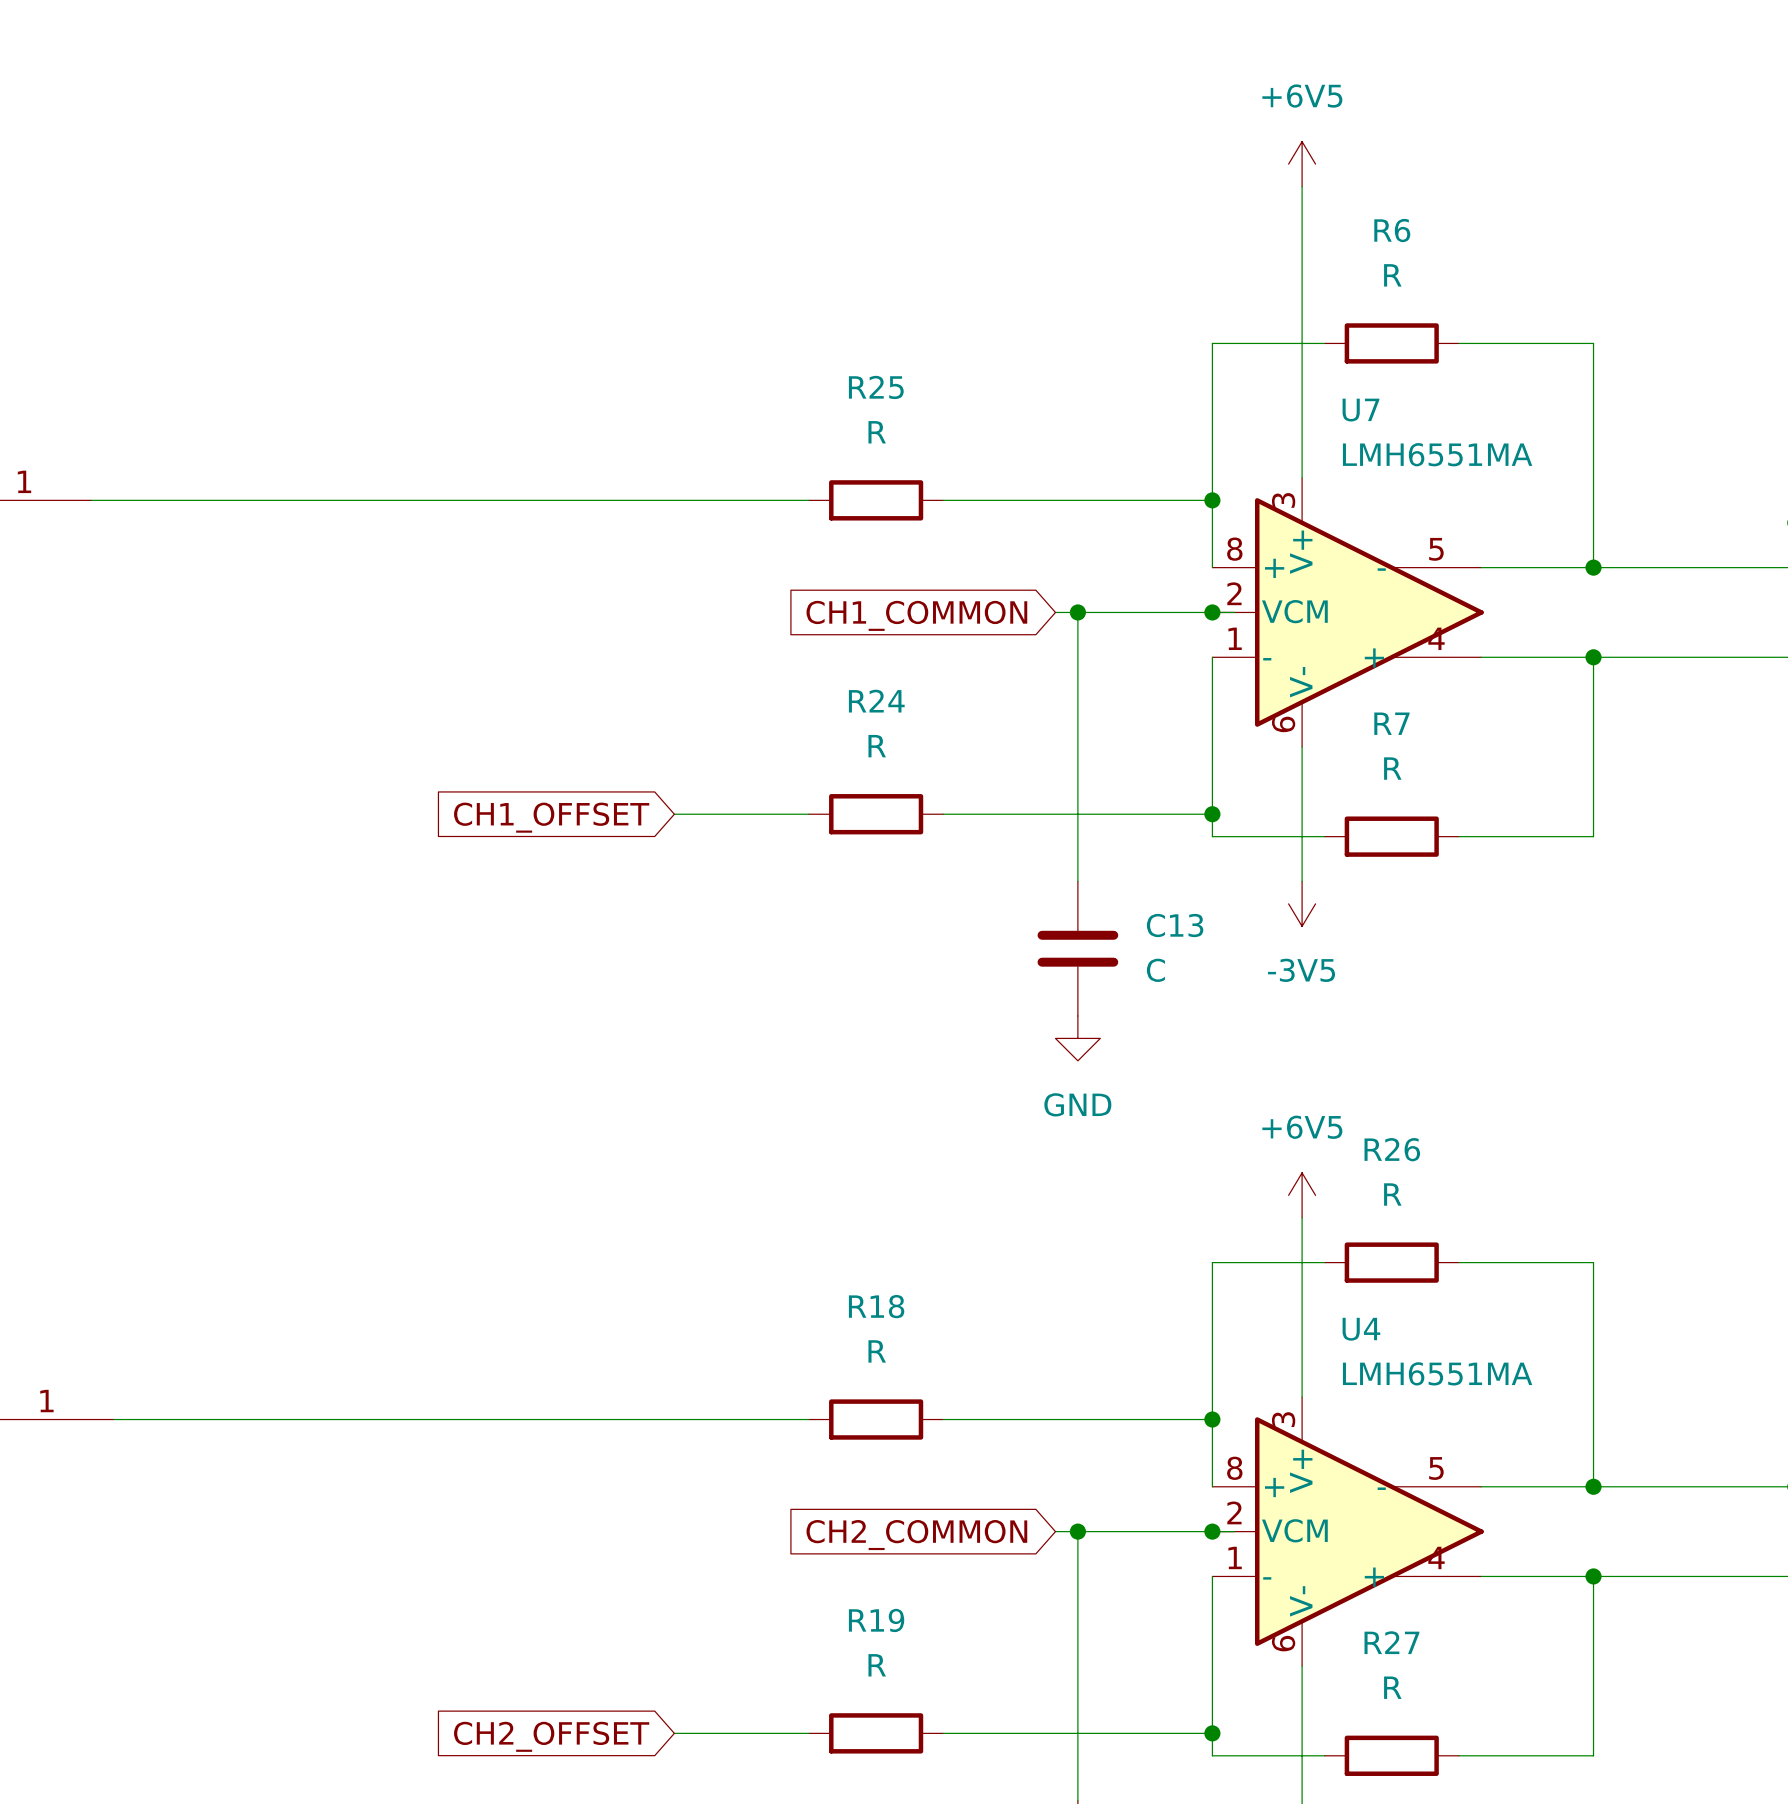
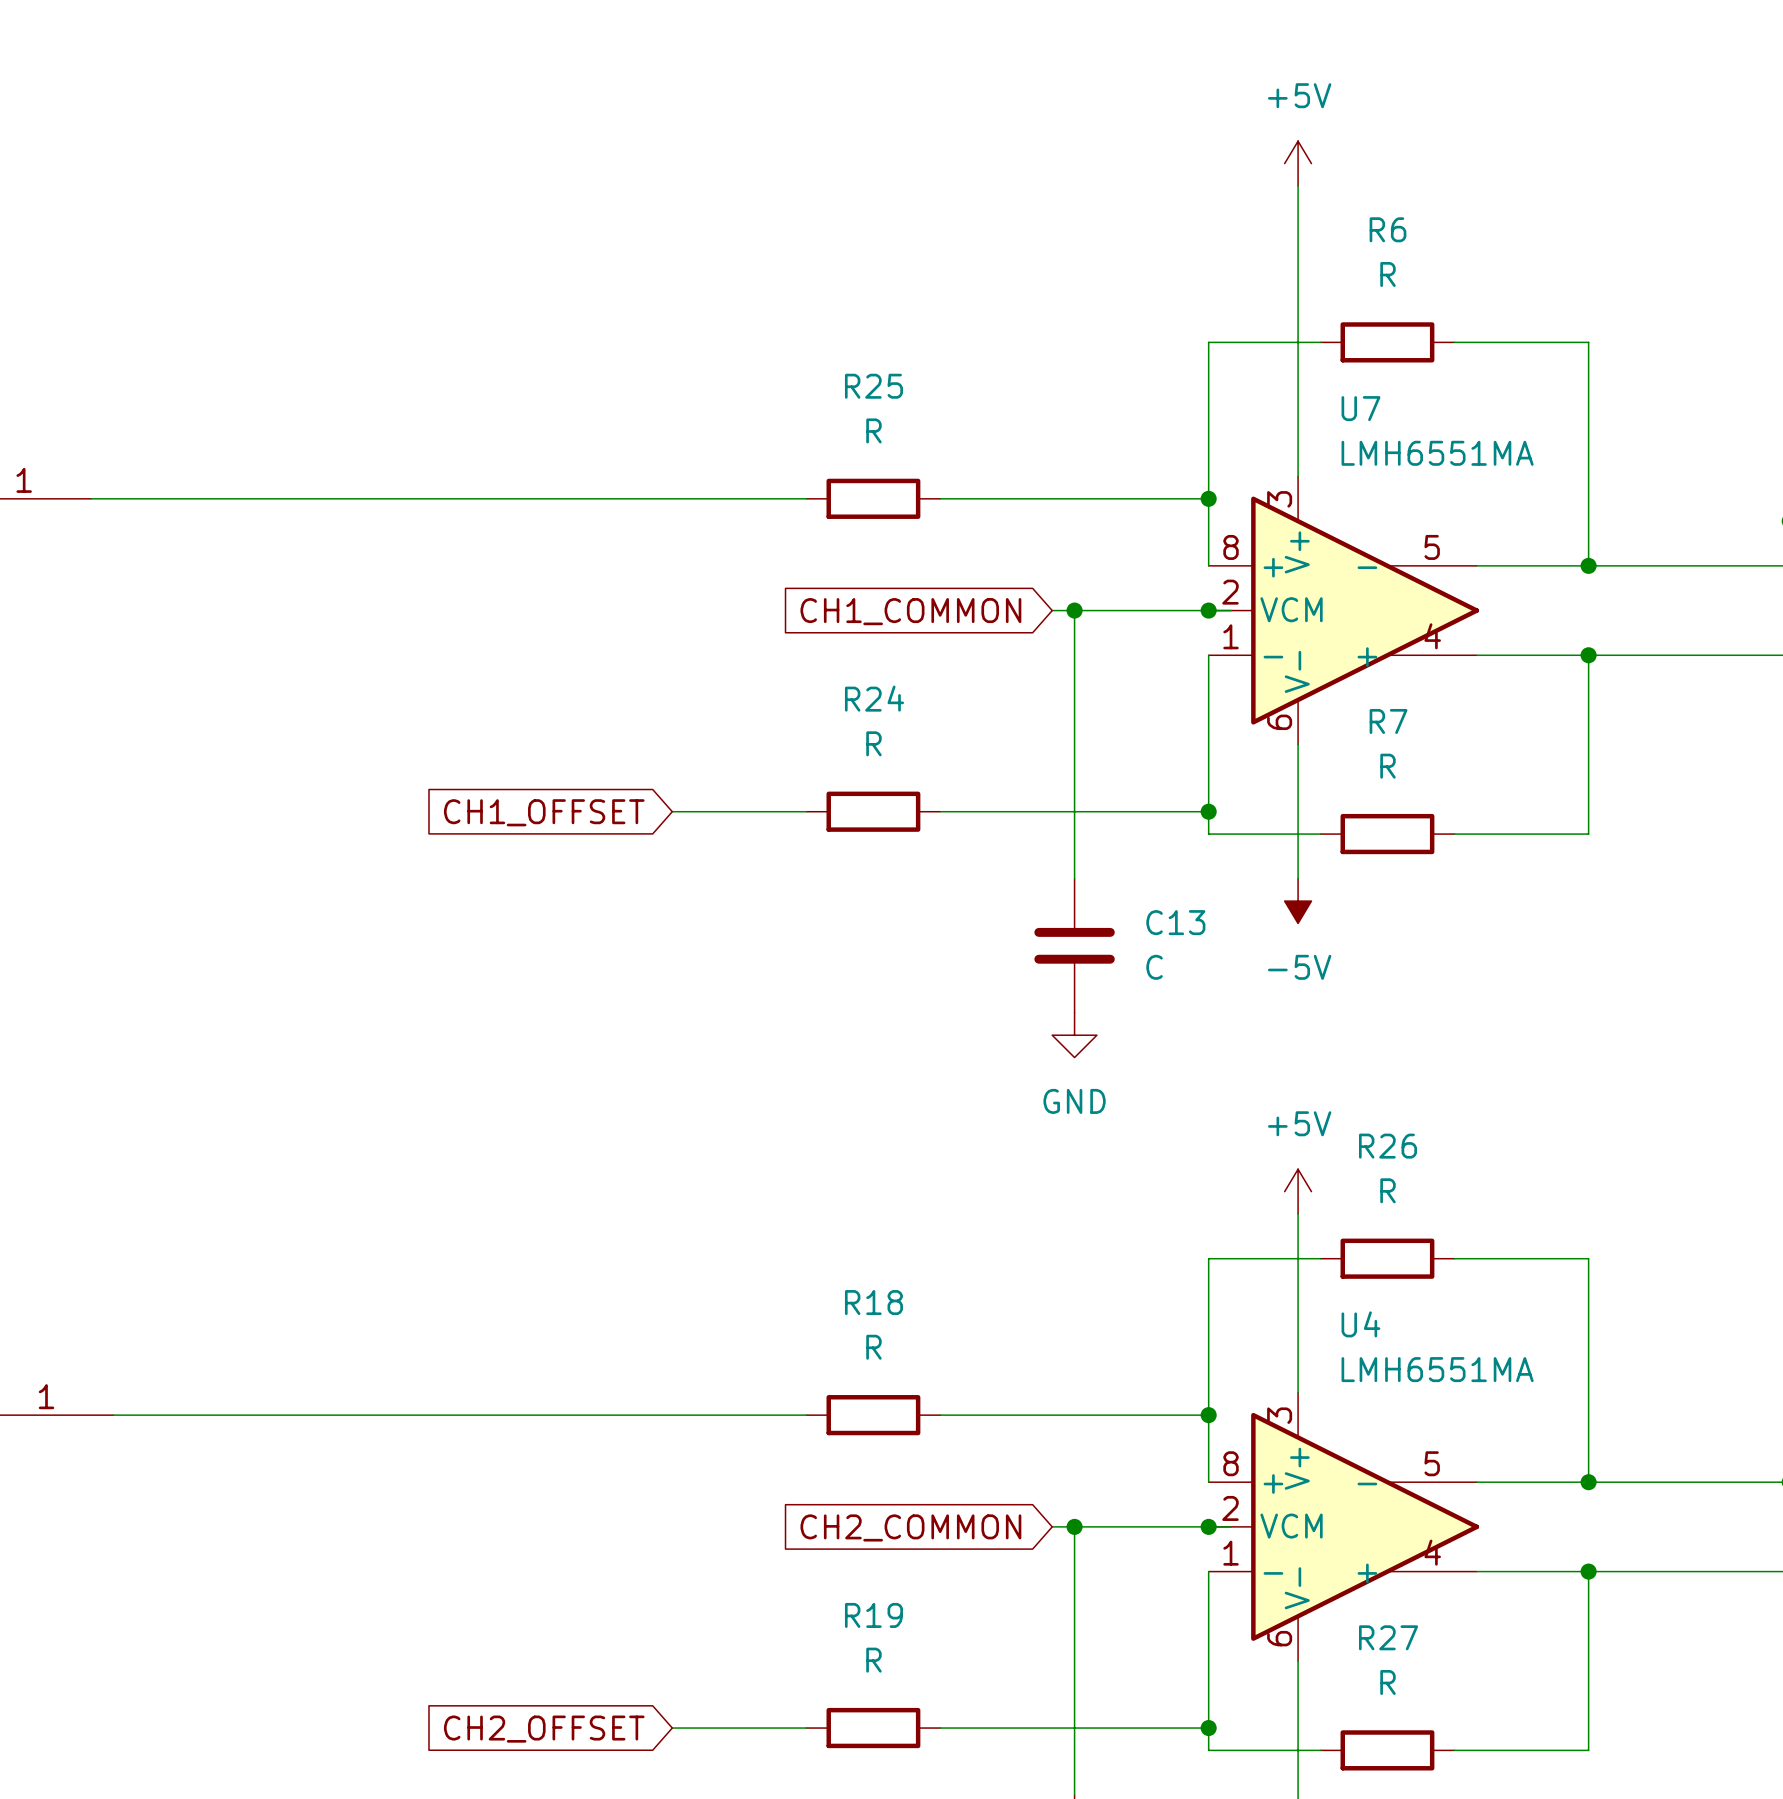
power symbol: +6V5 (1302, 164) -> +5V (1298, 163)
power symbol: -3V5 (1302, 903) -> -5V (1298, 901)
power symbol: +6V5 (1302, 1195) -> +5V (1298, 1191)

